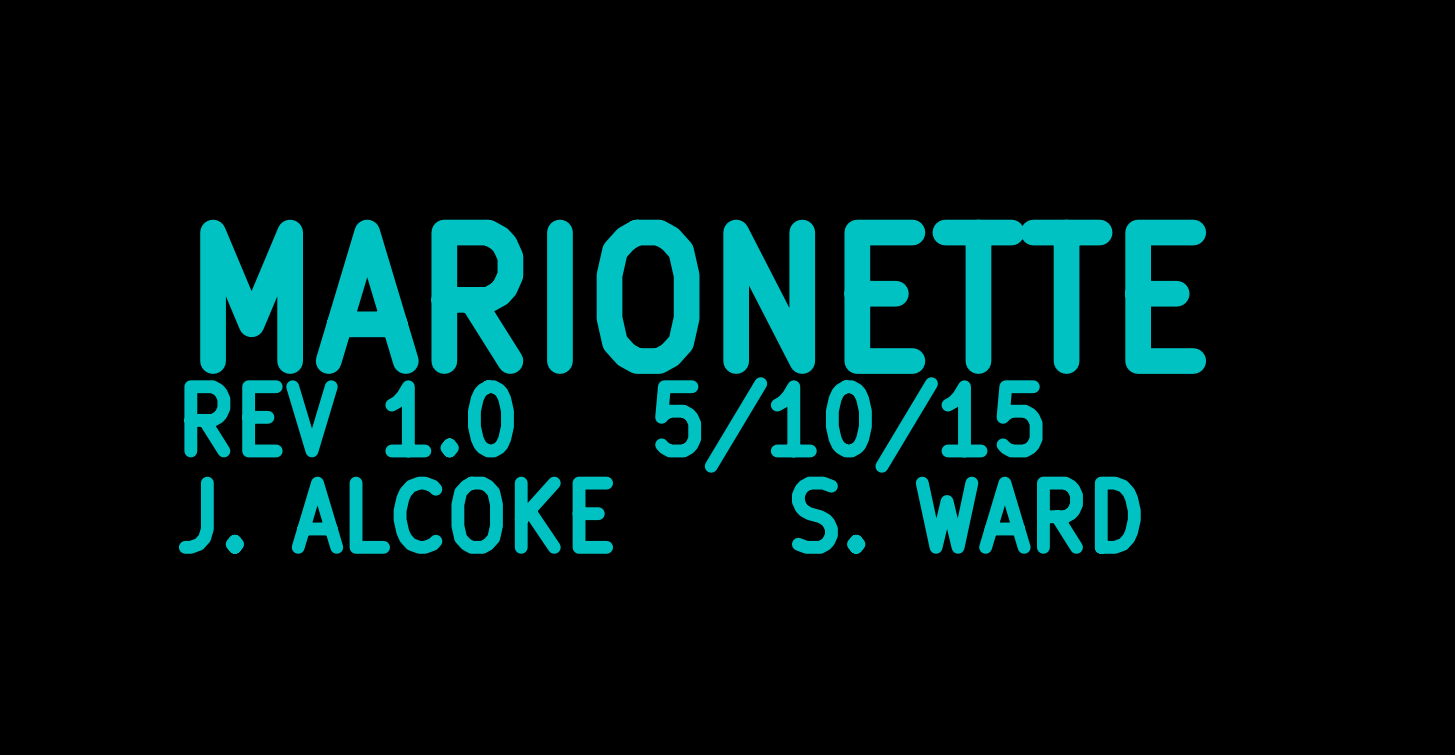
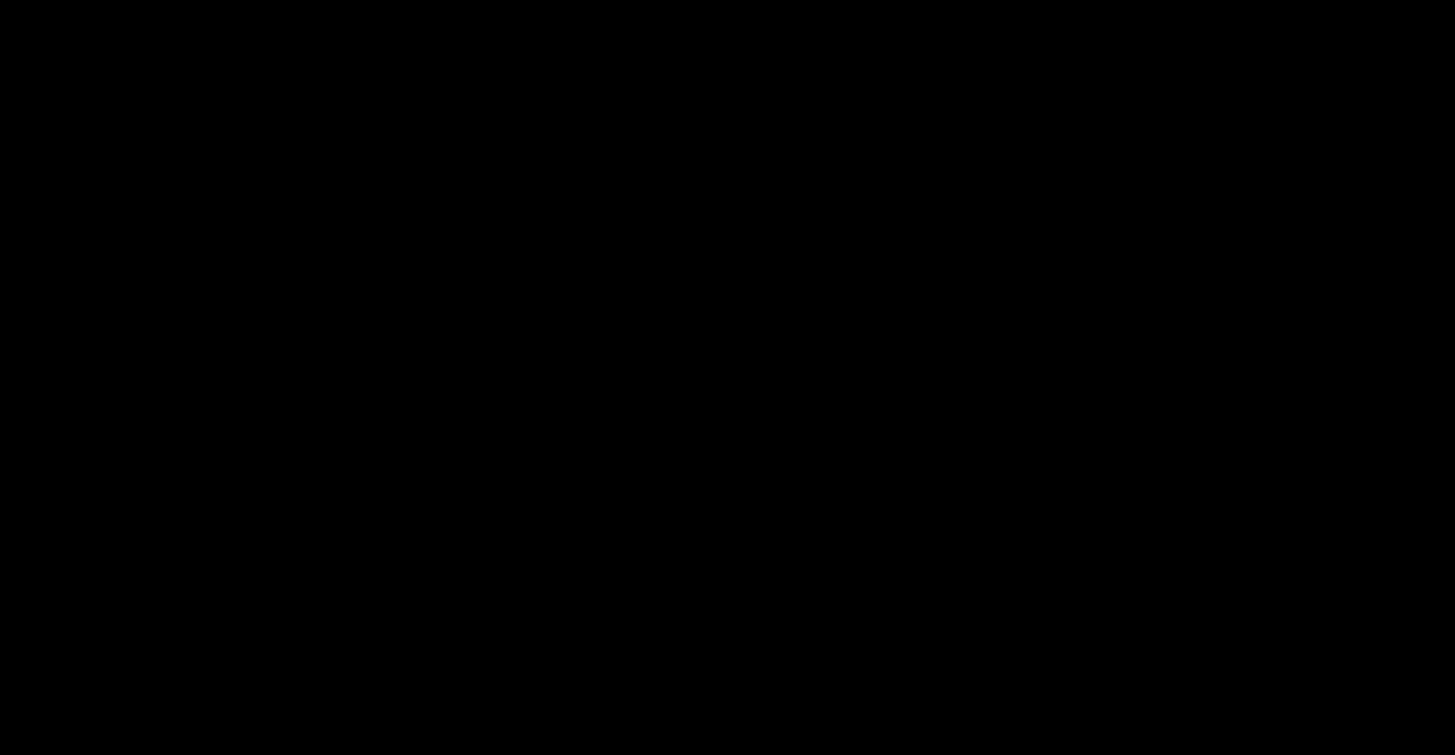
text: MARIONETTE (703, 296) -> none
text: REV 1.0 5/10/15 (613, 424) -> none
text: J. ALCOKE (395, 515) -> none
text: S. WARD (966, 515) -> none

